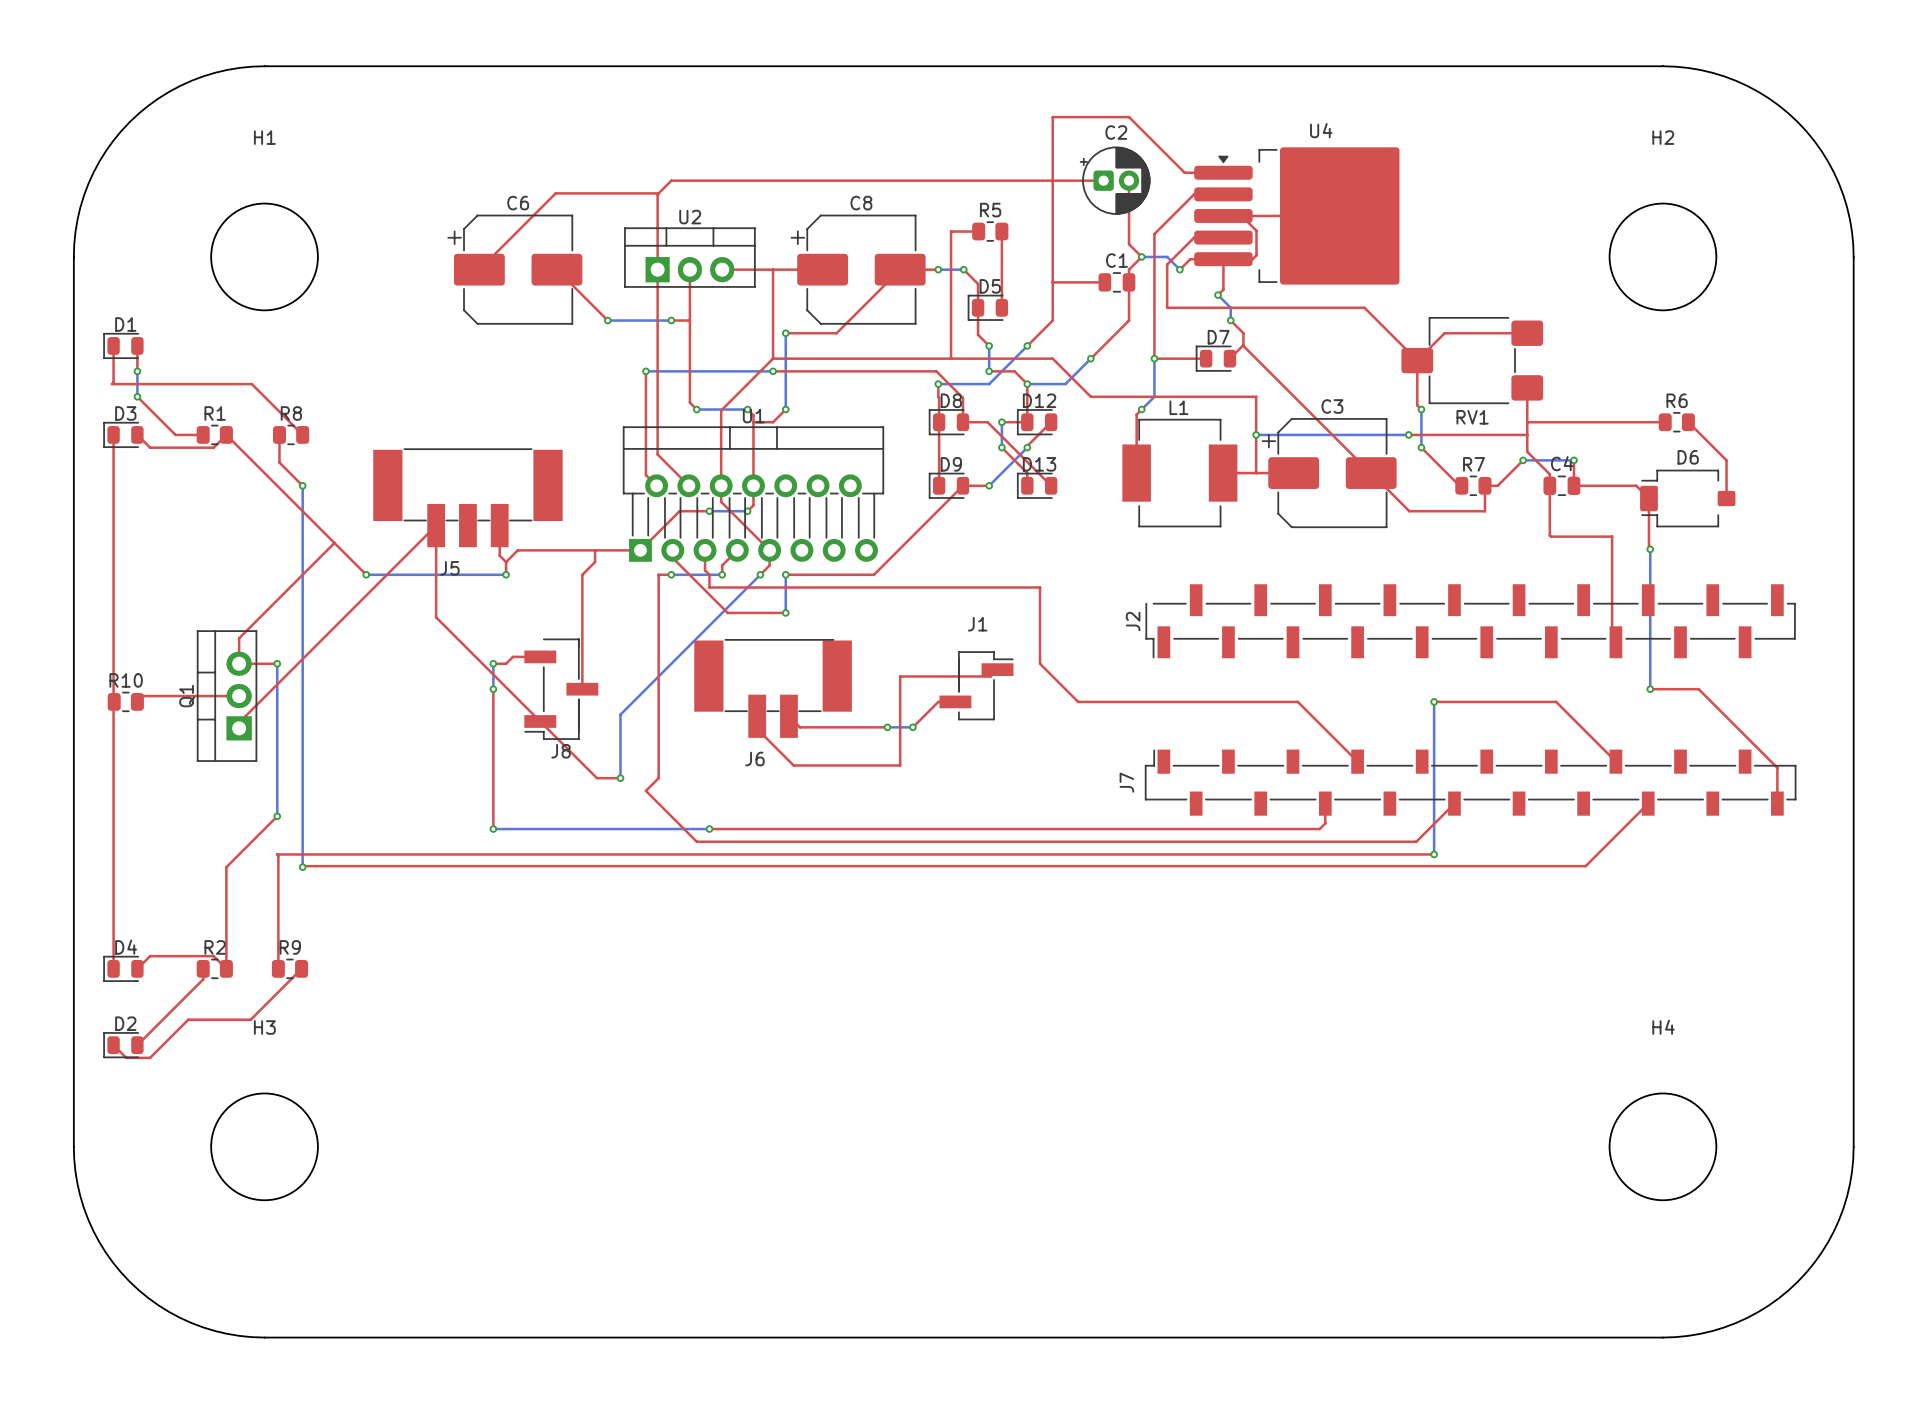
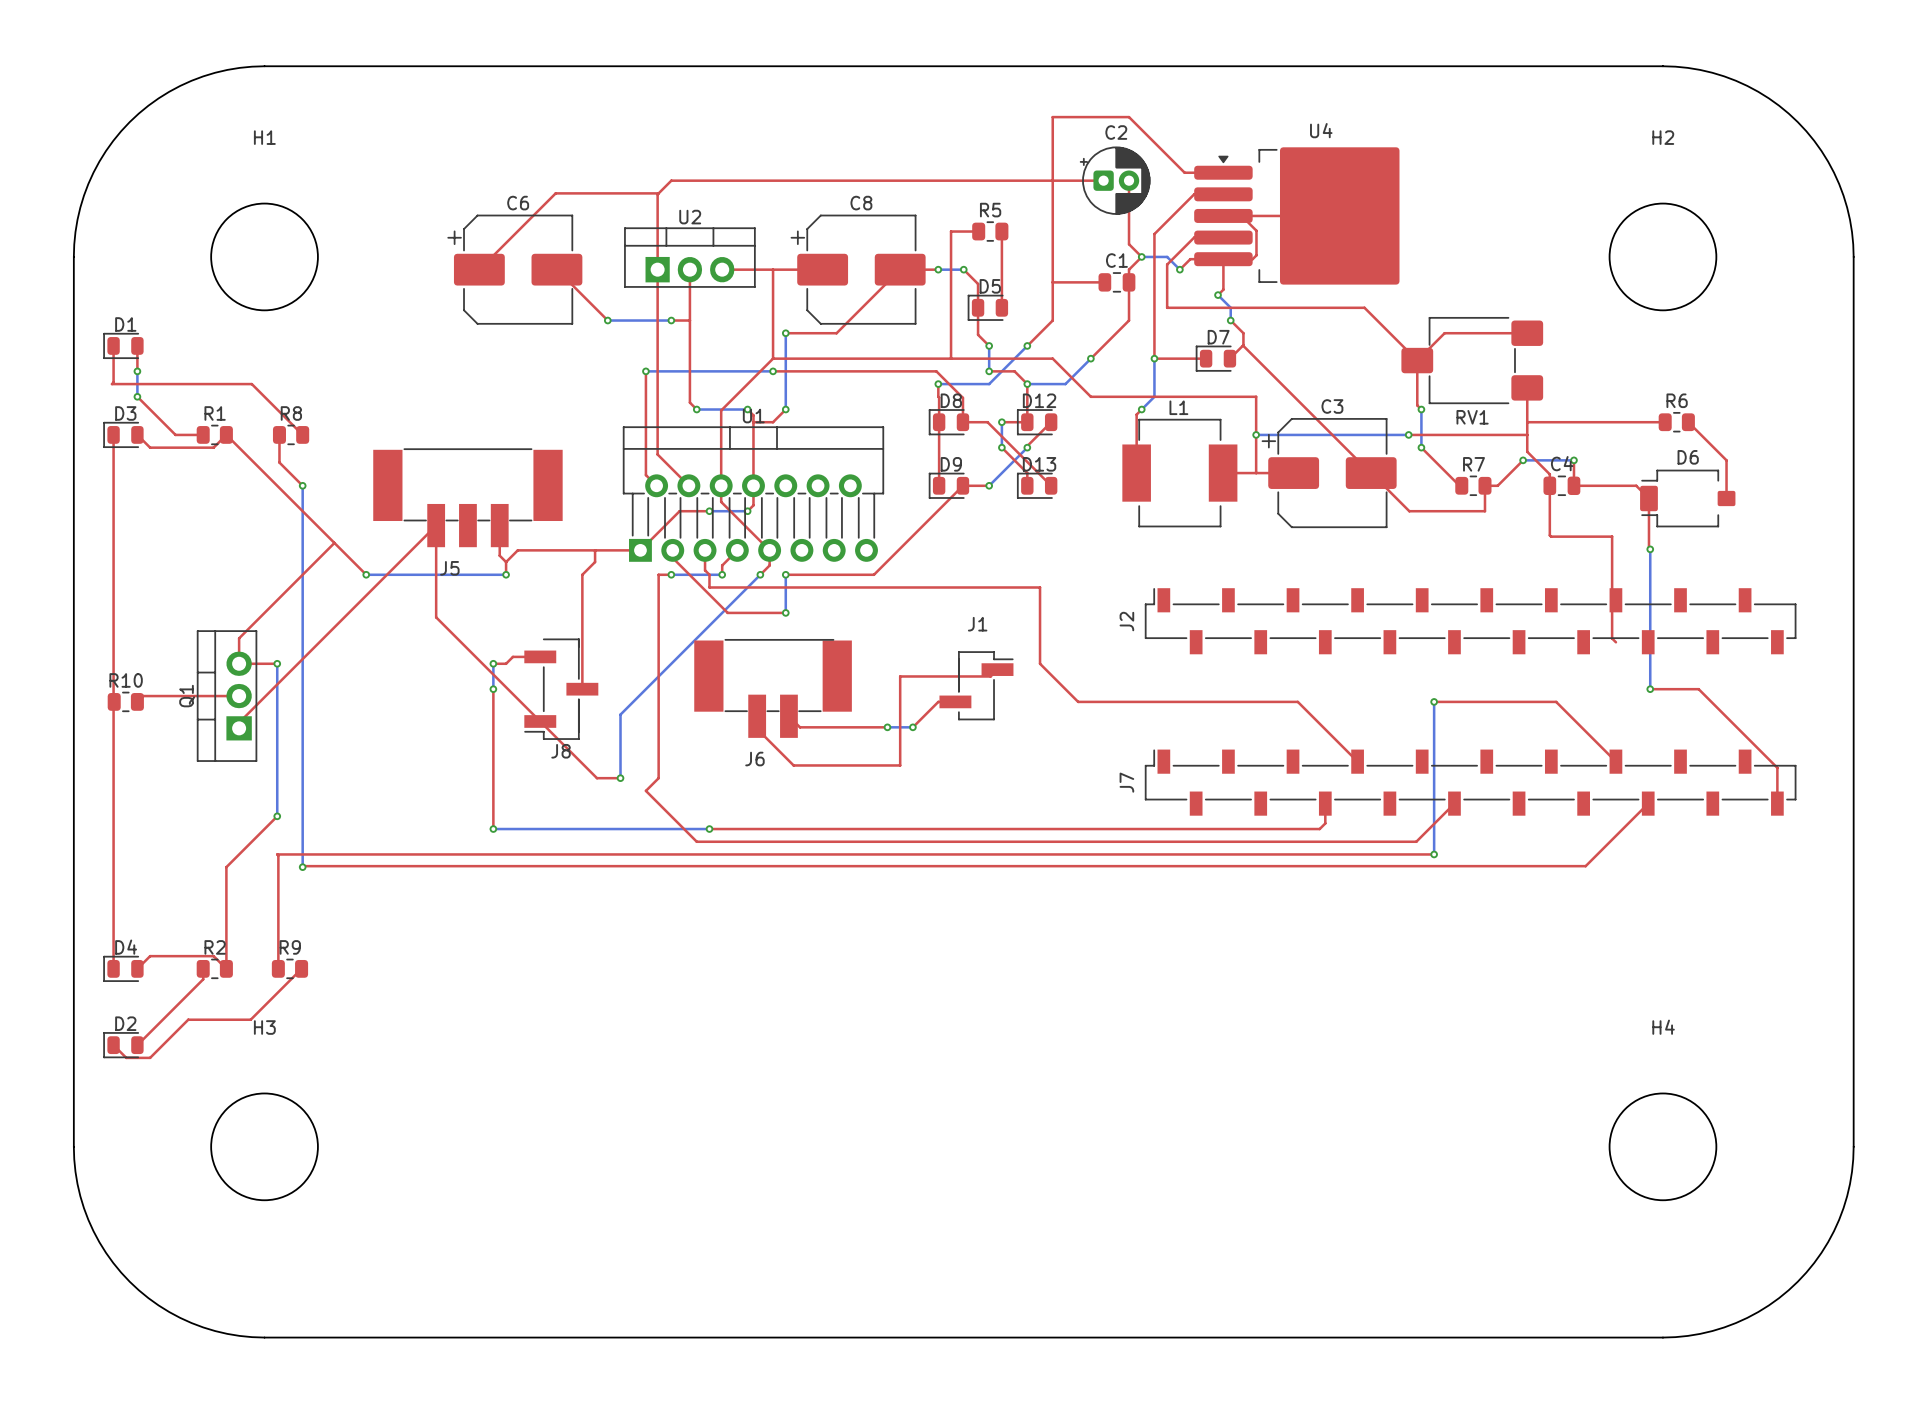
J2 footprint: [1145, 584, 1796, 659] -> [1144, 588, 1797, 655]

